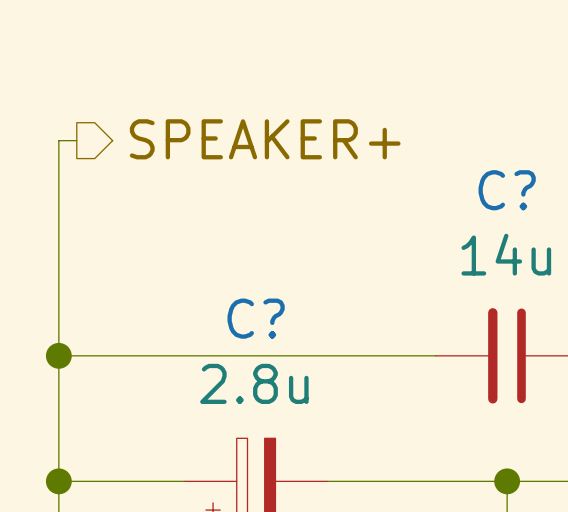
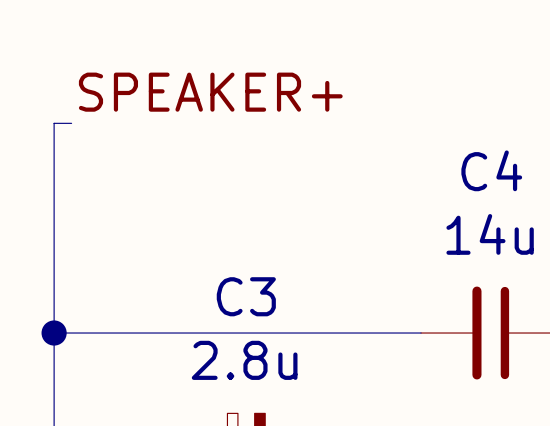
label: none -> SPEAKER+ (210, 92)
hierarchical label: SPEAKER+ (265, 139) -> none
C? name: C? (507, 190) -> C4 (491, 170)
C? name: C? (256, 318) -> C3 (246, 296)

